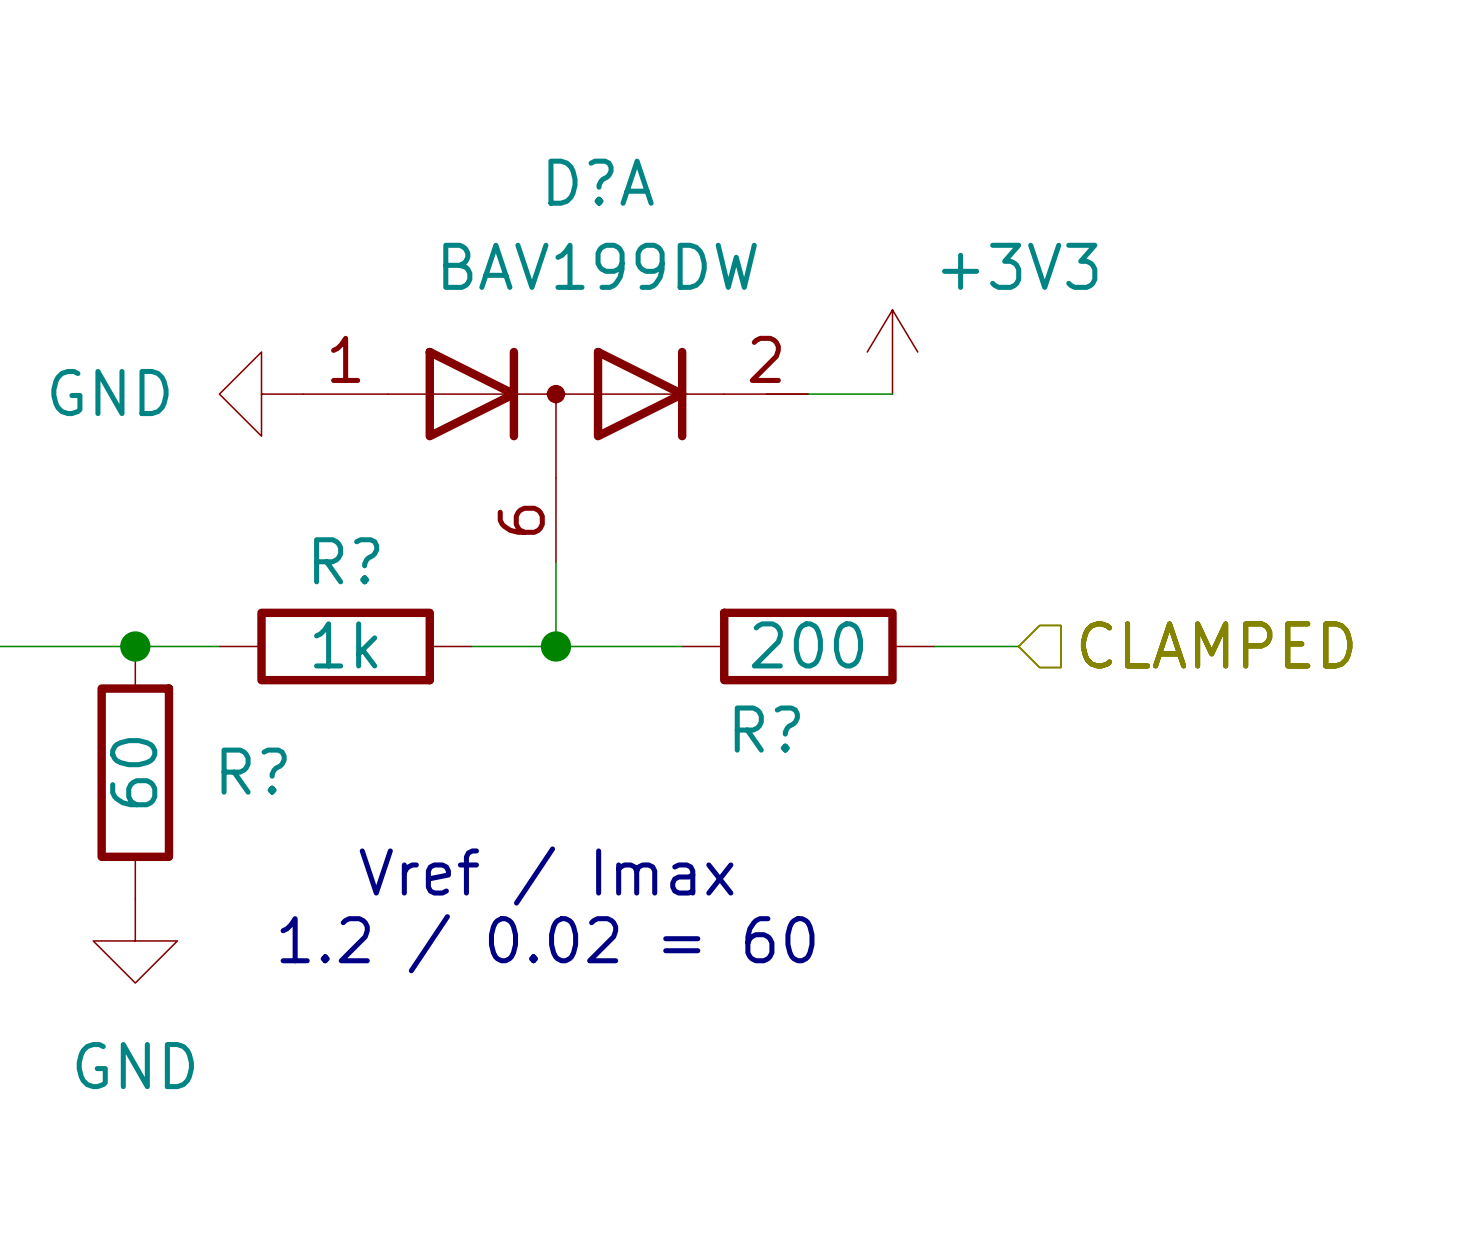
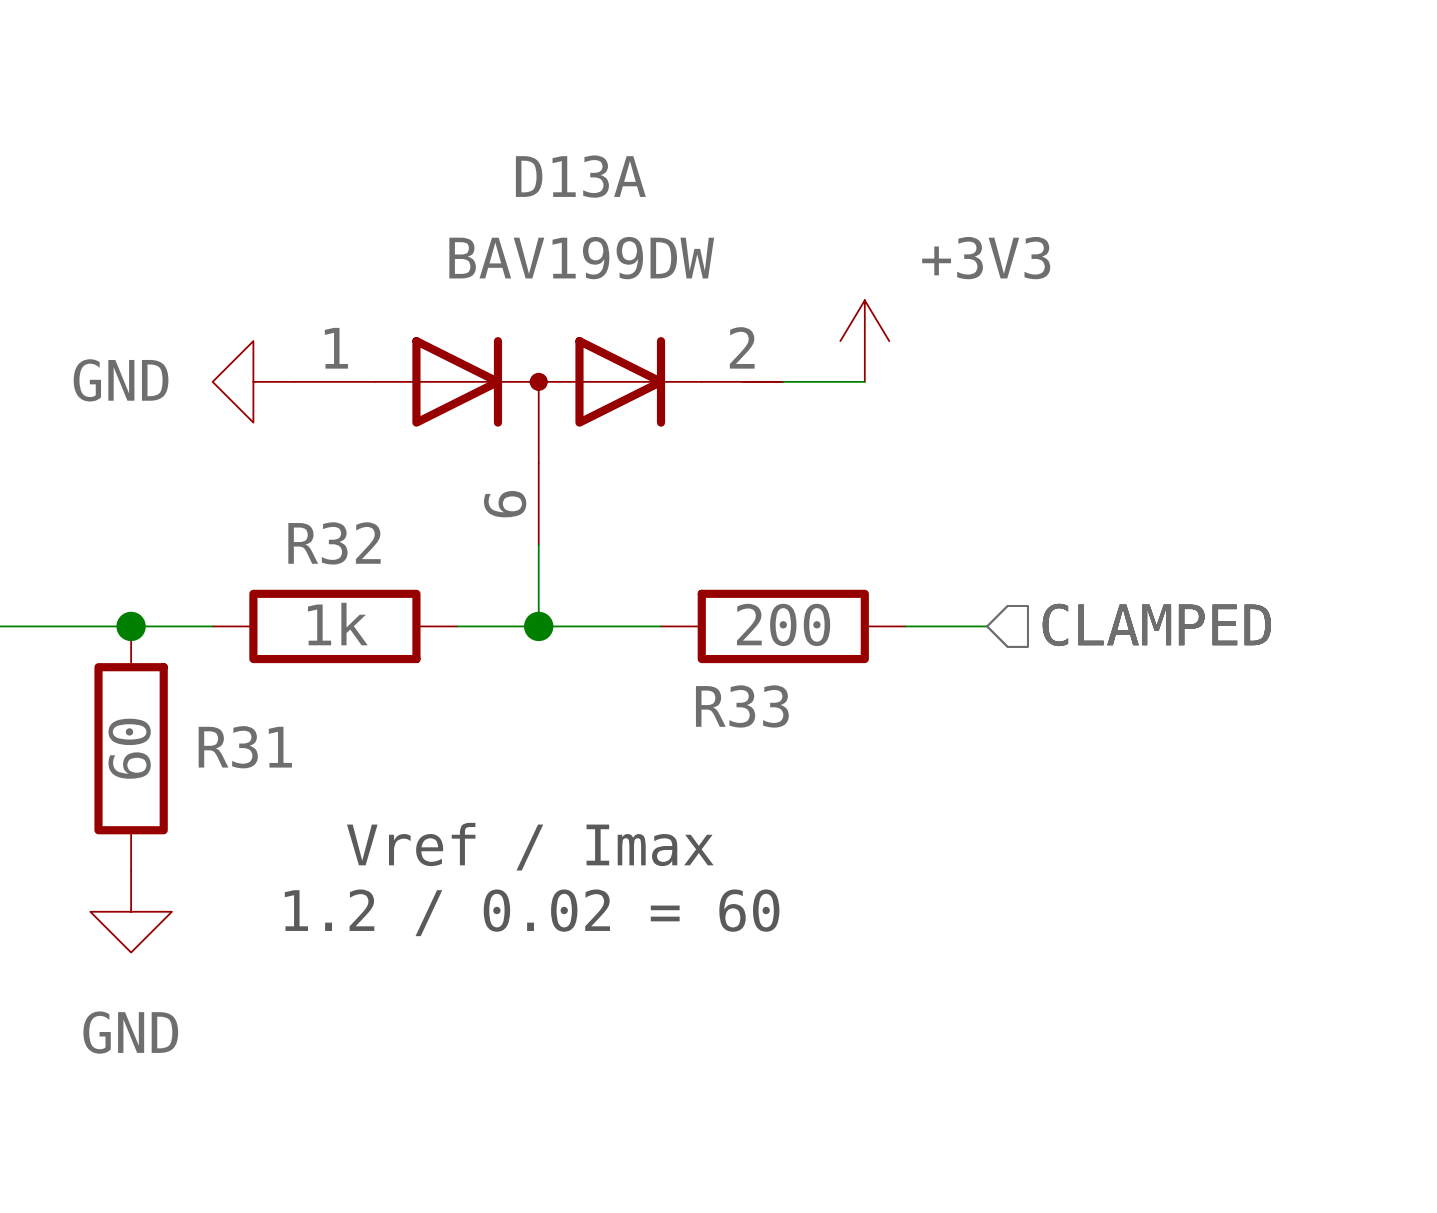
D?A name: D?A (601, 182) -> D13A (580, 176)
R? name: R? (346, 560) -> R32 (334, 543)
R? name: R? (767, 729) -> R33 (742, 706)
R? name: R? (254, 771) -> R31 (245, 747)

